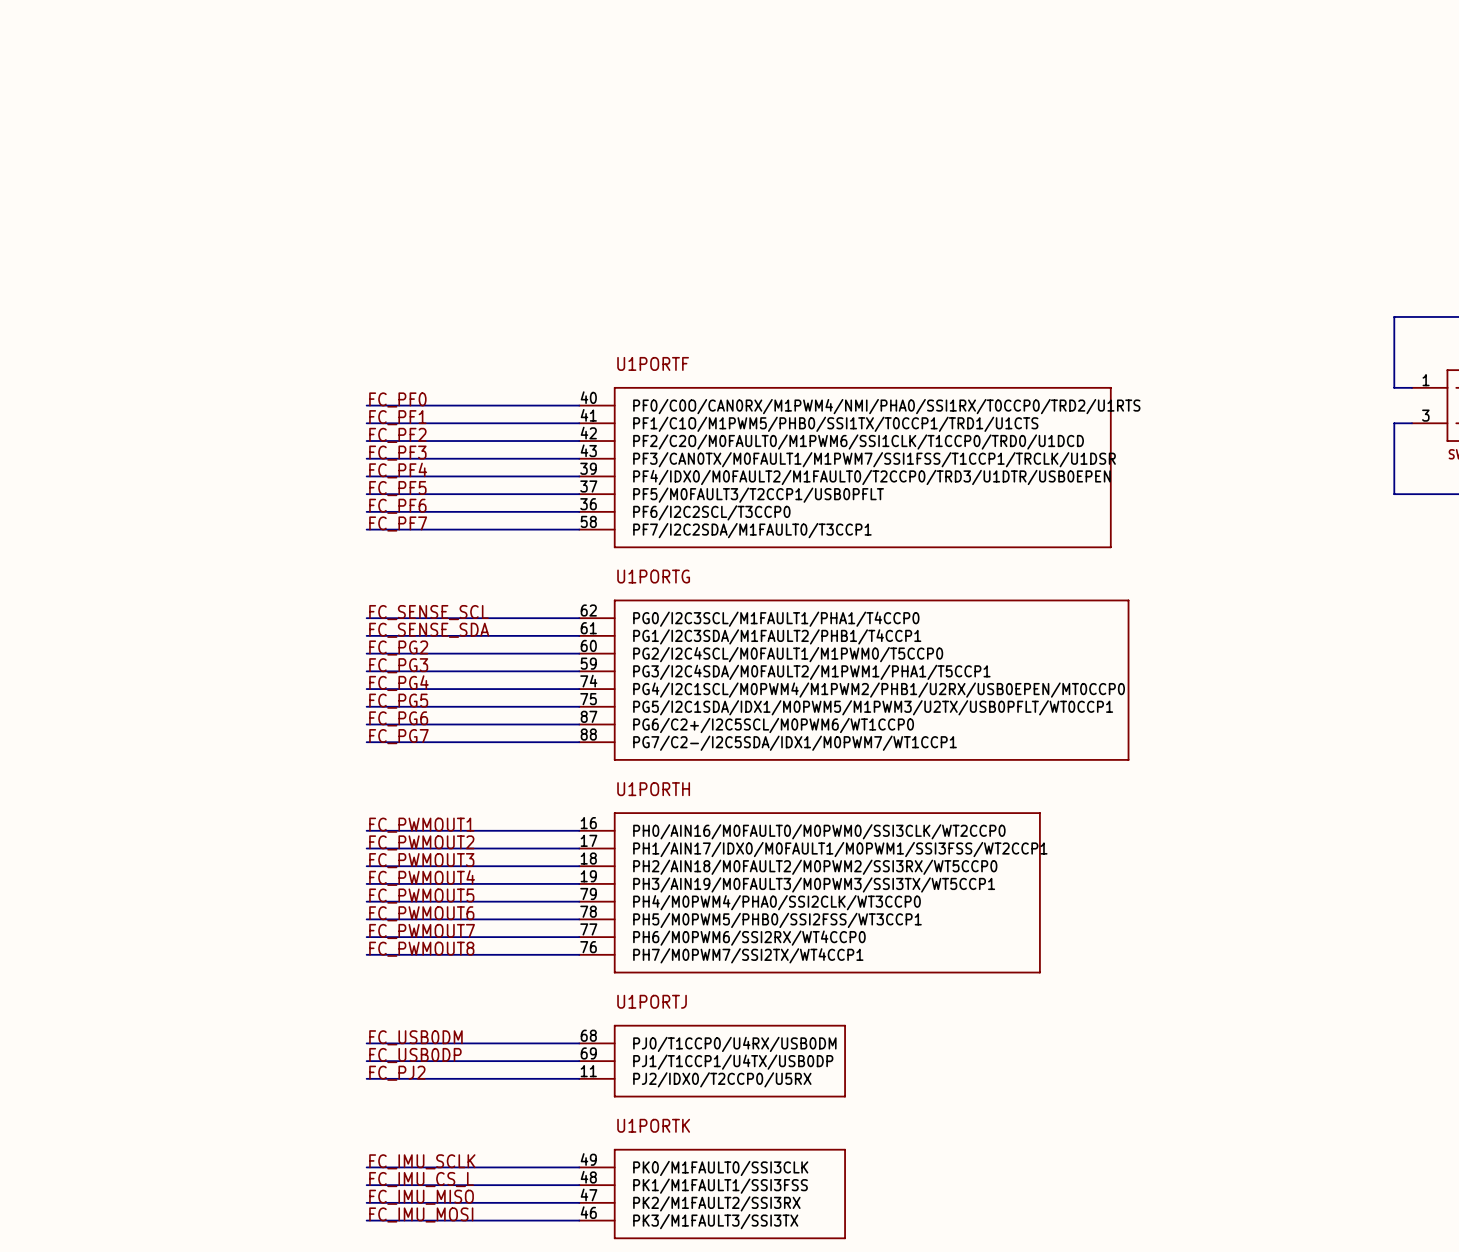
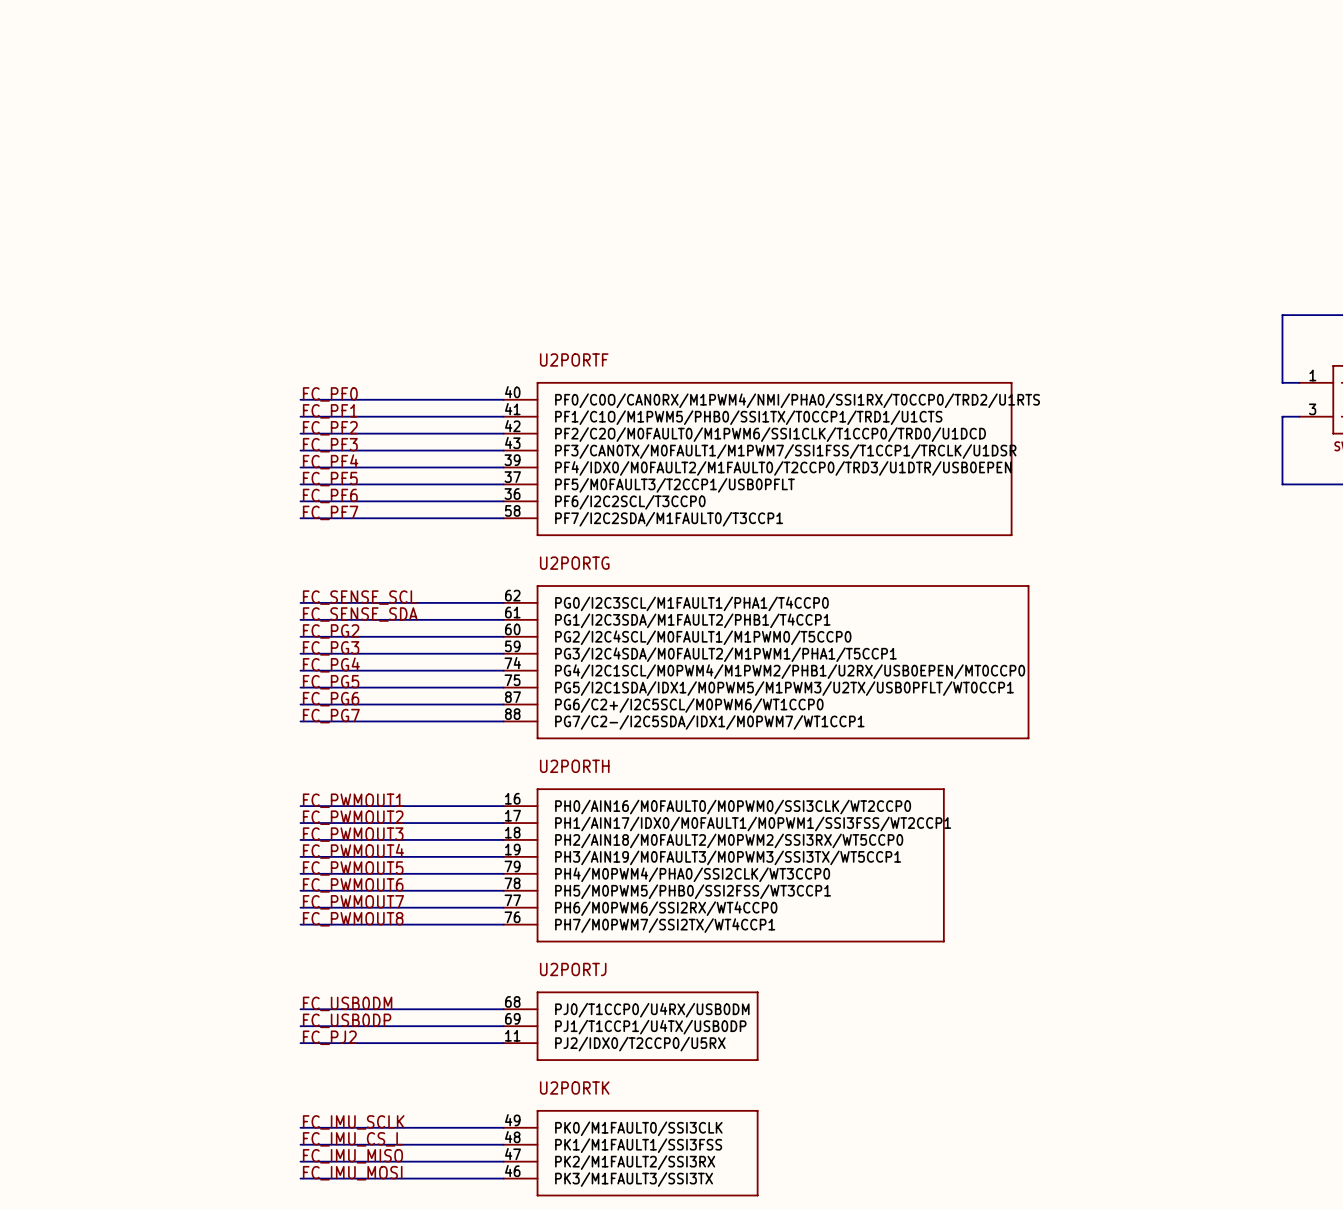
U1PORTF name: U1PORTF (653, 363) -> U2PORTF (574, 359)
U1PORTG name: U1PORTG (653, 576) -> U2PORTG (574, 563)
U1PORTH name: U1PORTH (653, 789) -> U2PORTH (574, 766)
U1PORTJ name: U1PORTJ (652, 1001) -> U2PORTJ (573, 969)
U1PORTK name: U1PORTK (653, 1125) -> U2PORTK (574, 1087)

